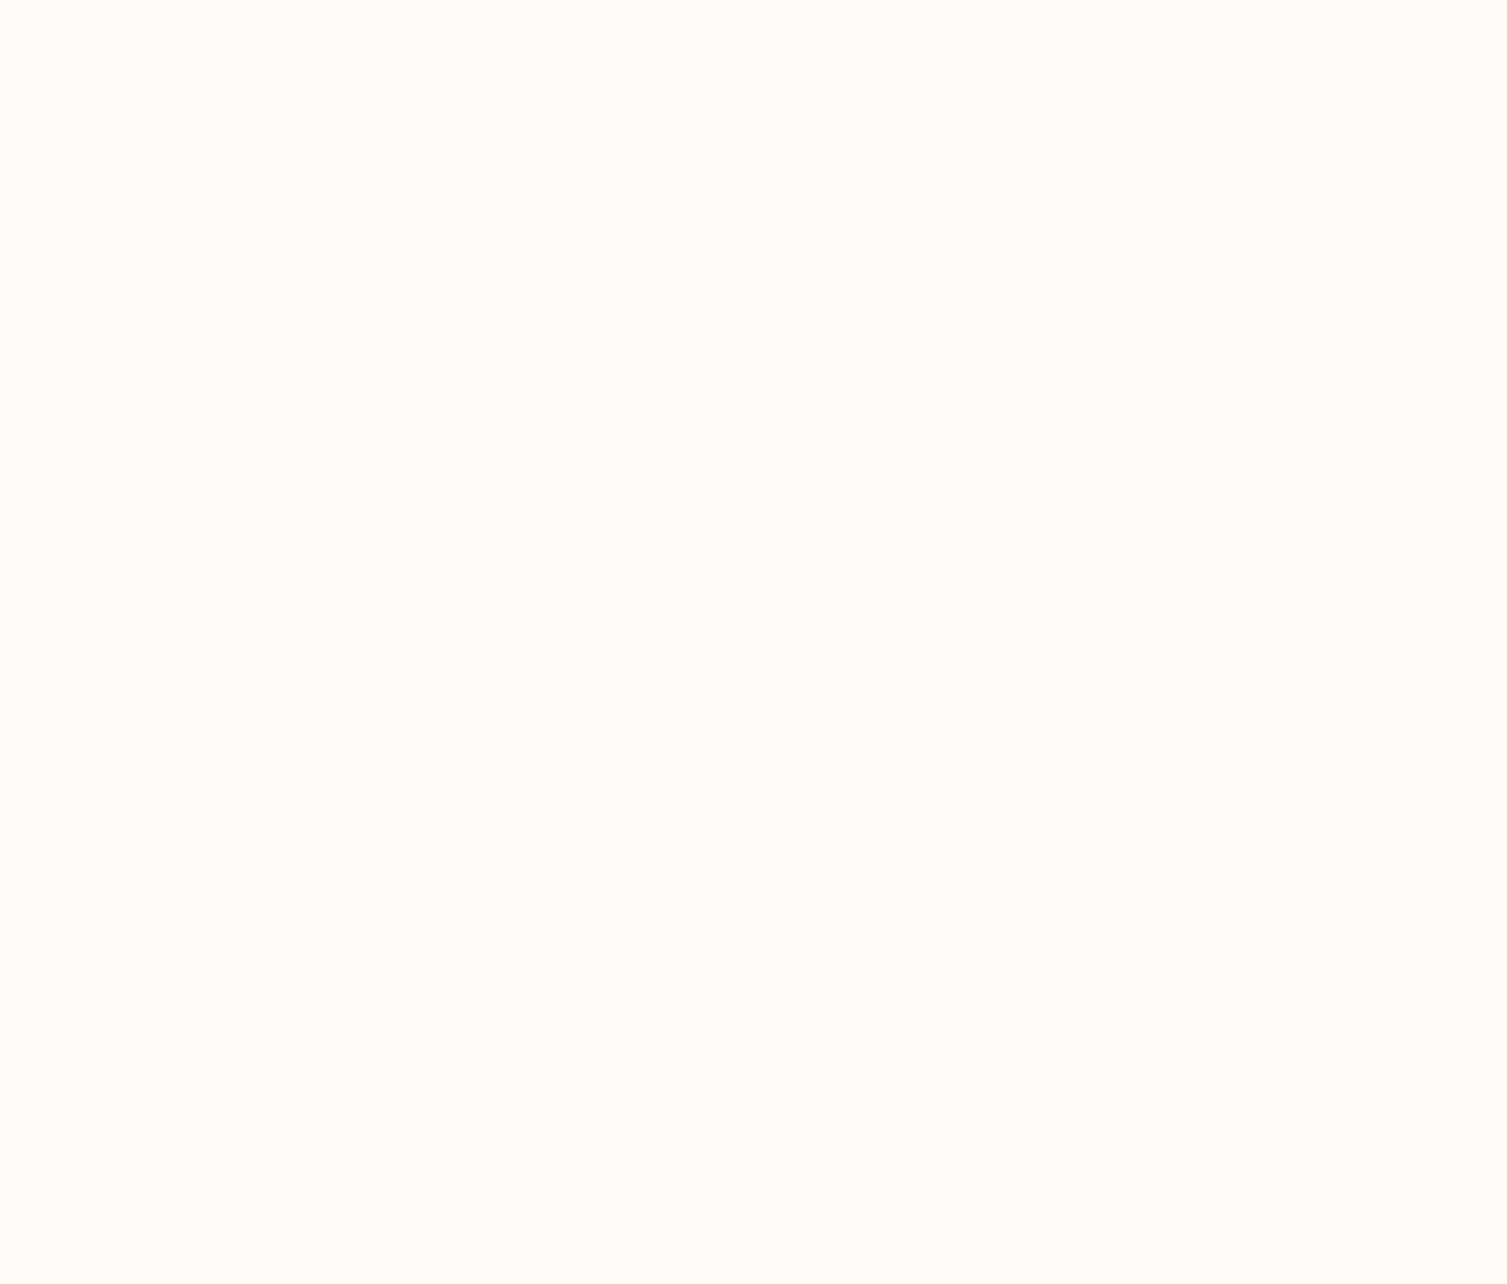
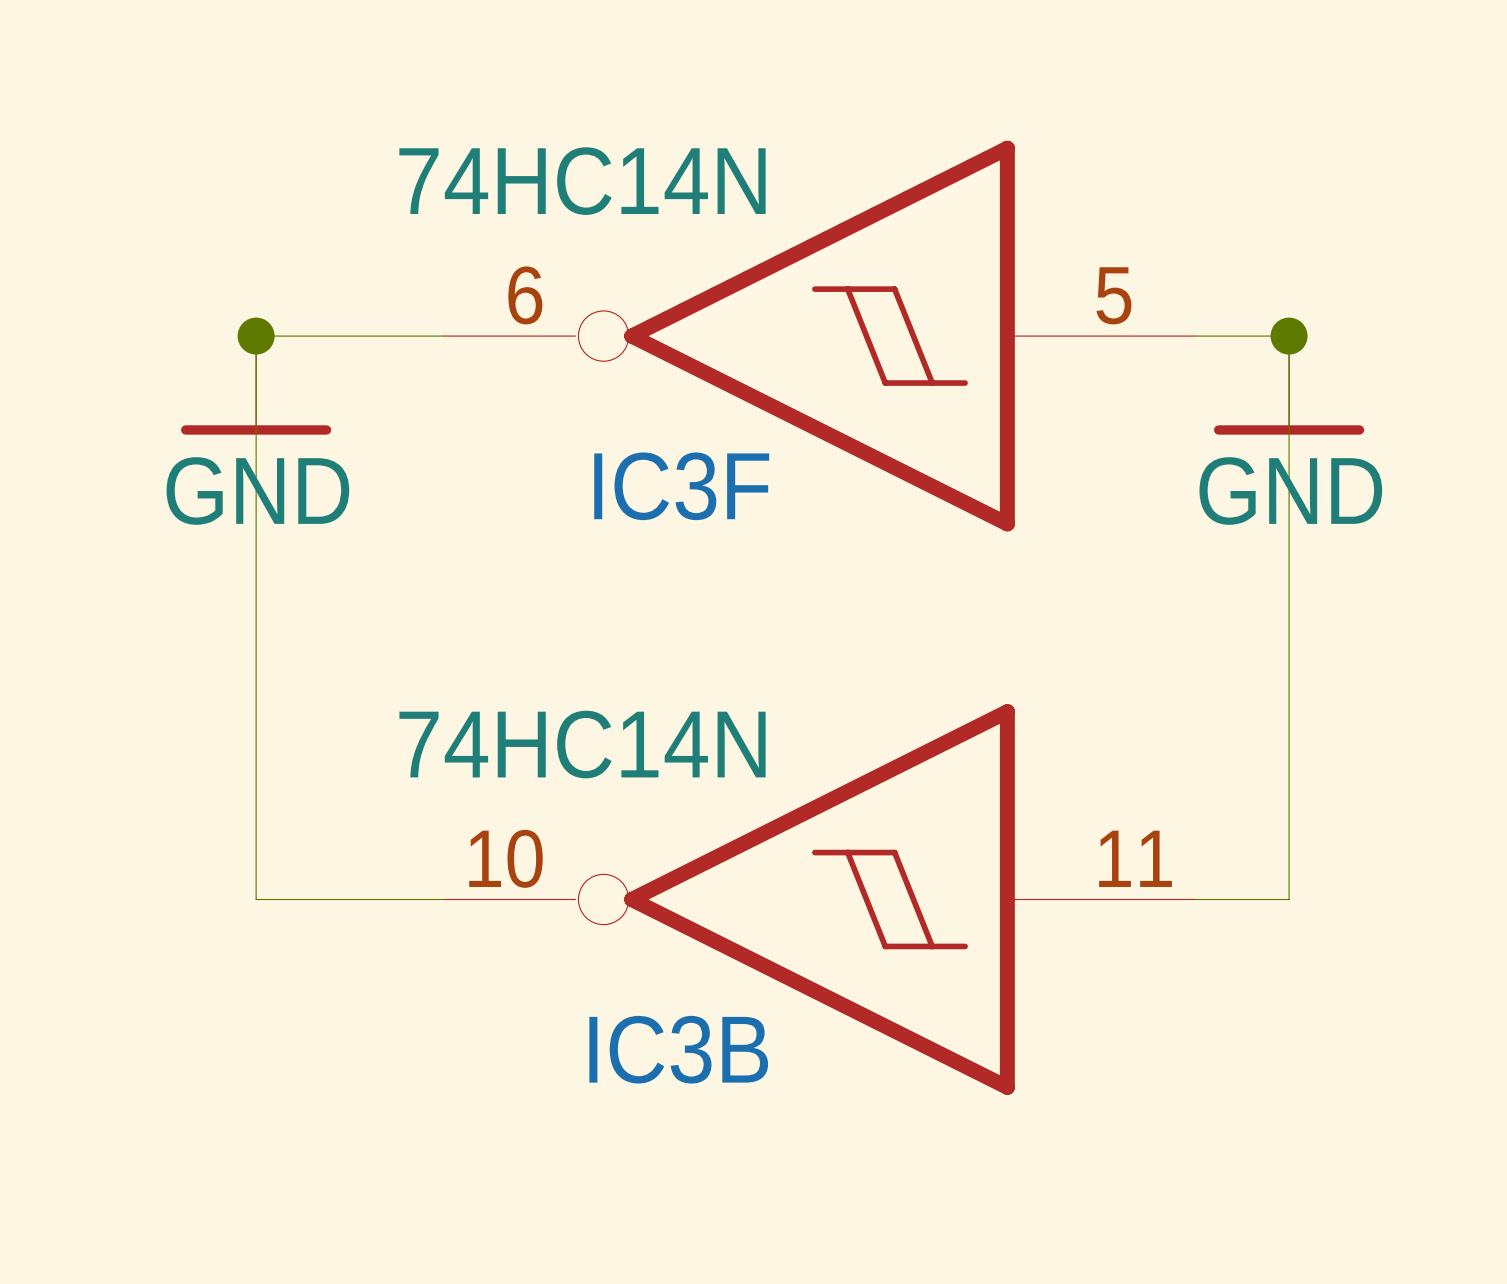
junction: none -> (256, 336)
wire: none -> (443, 336) (256, 336) (256, 899) (443, 899)
IC3F: none -> 74HC14N (819, 336)
wire: none -> (1195, 336) (1289, 336) (1289, 899) (1195, 899)
junction: none -> (1289, 336)
power symbol: none -> GND (256, 385)
power symbol: none -> GND (1289, 385)
IC3B: none -> 74HC14N (819, 899)

